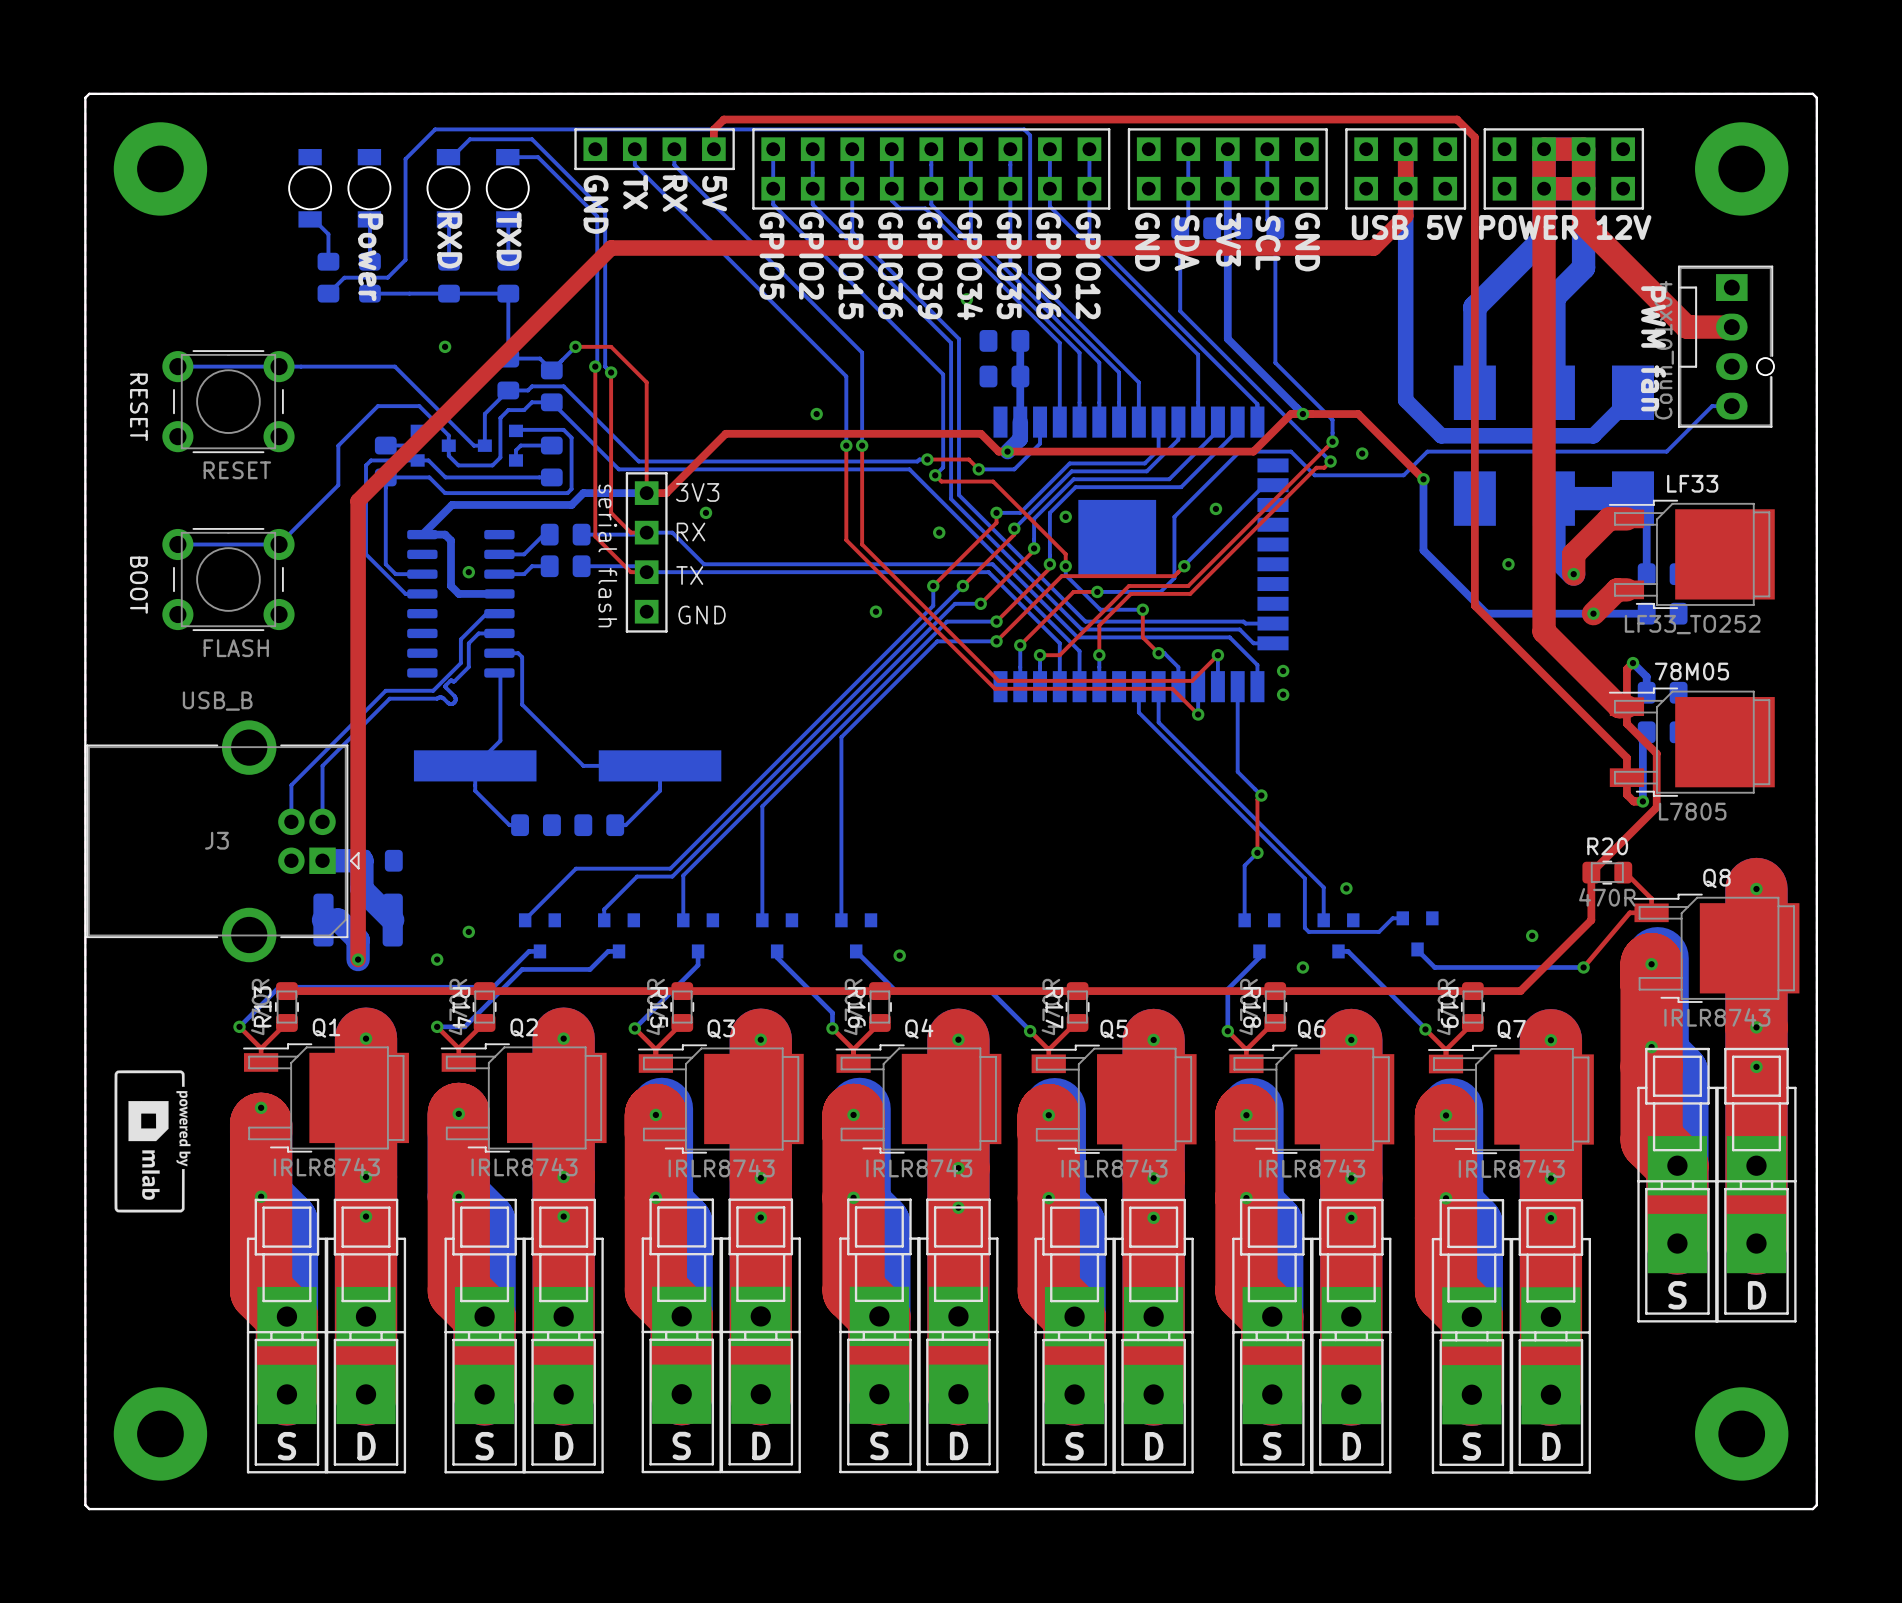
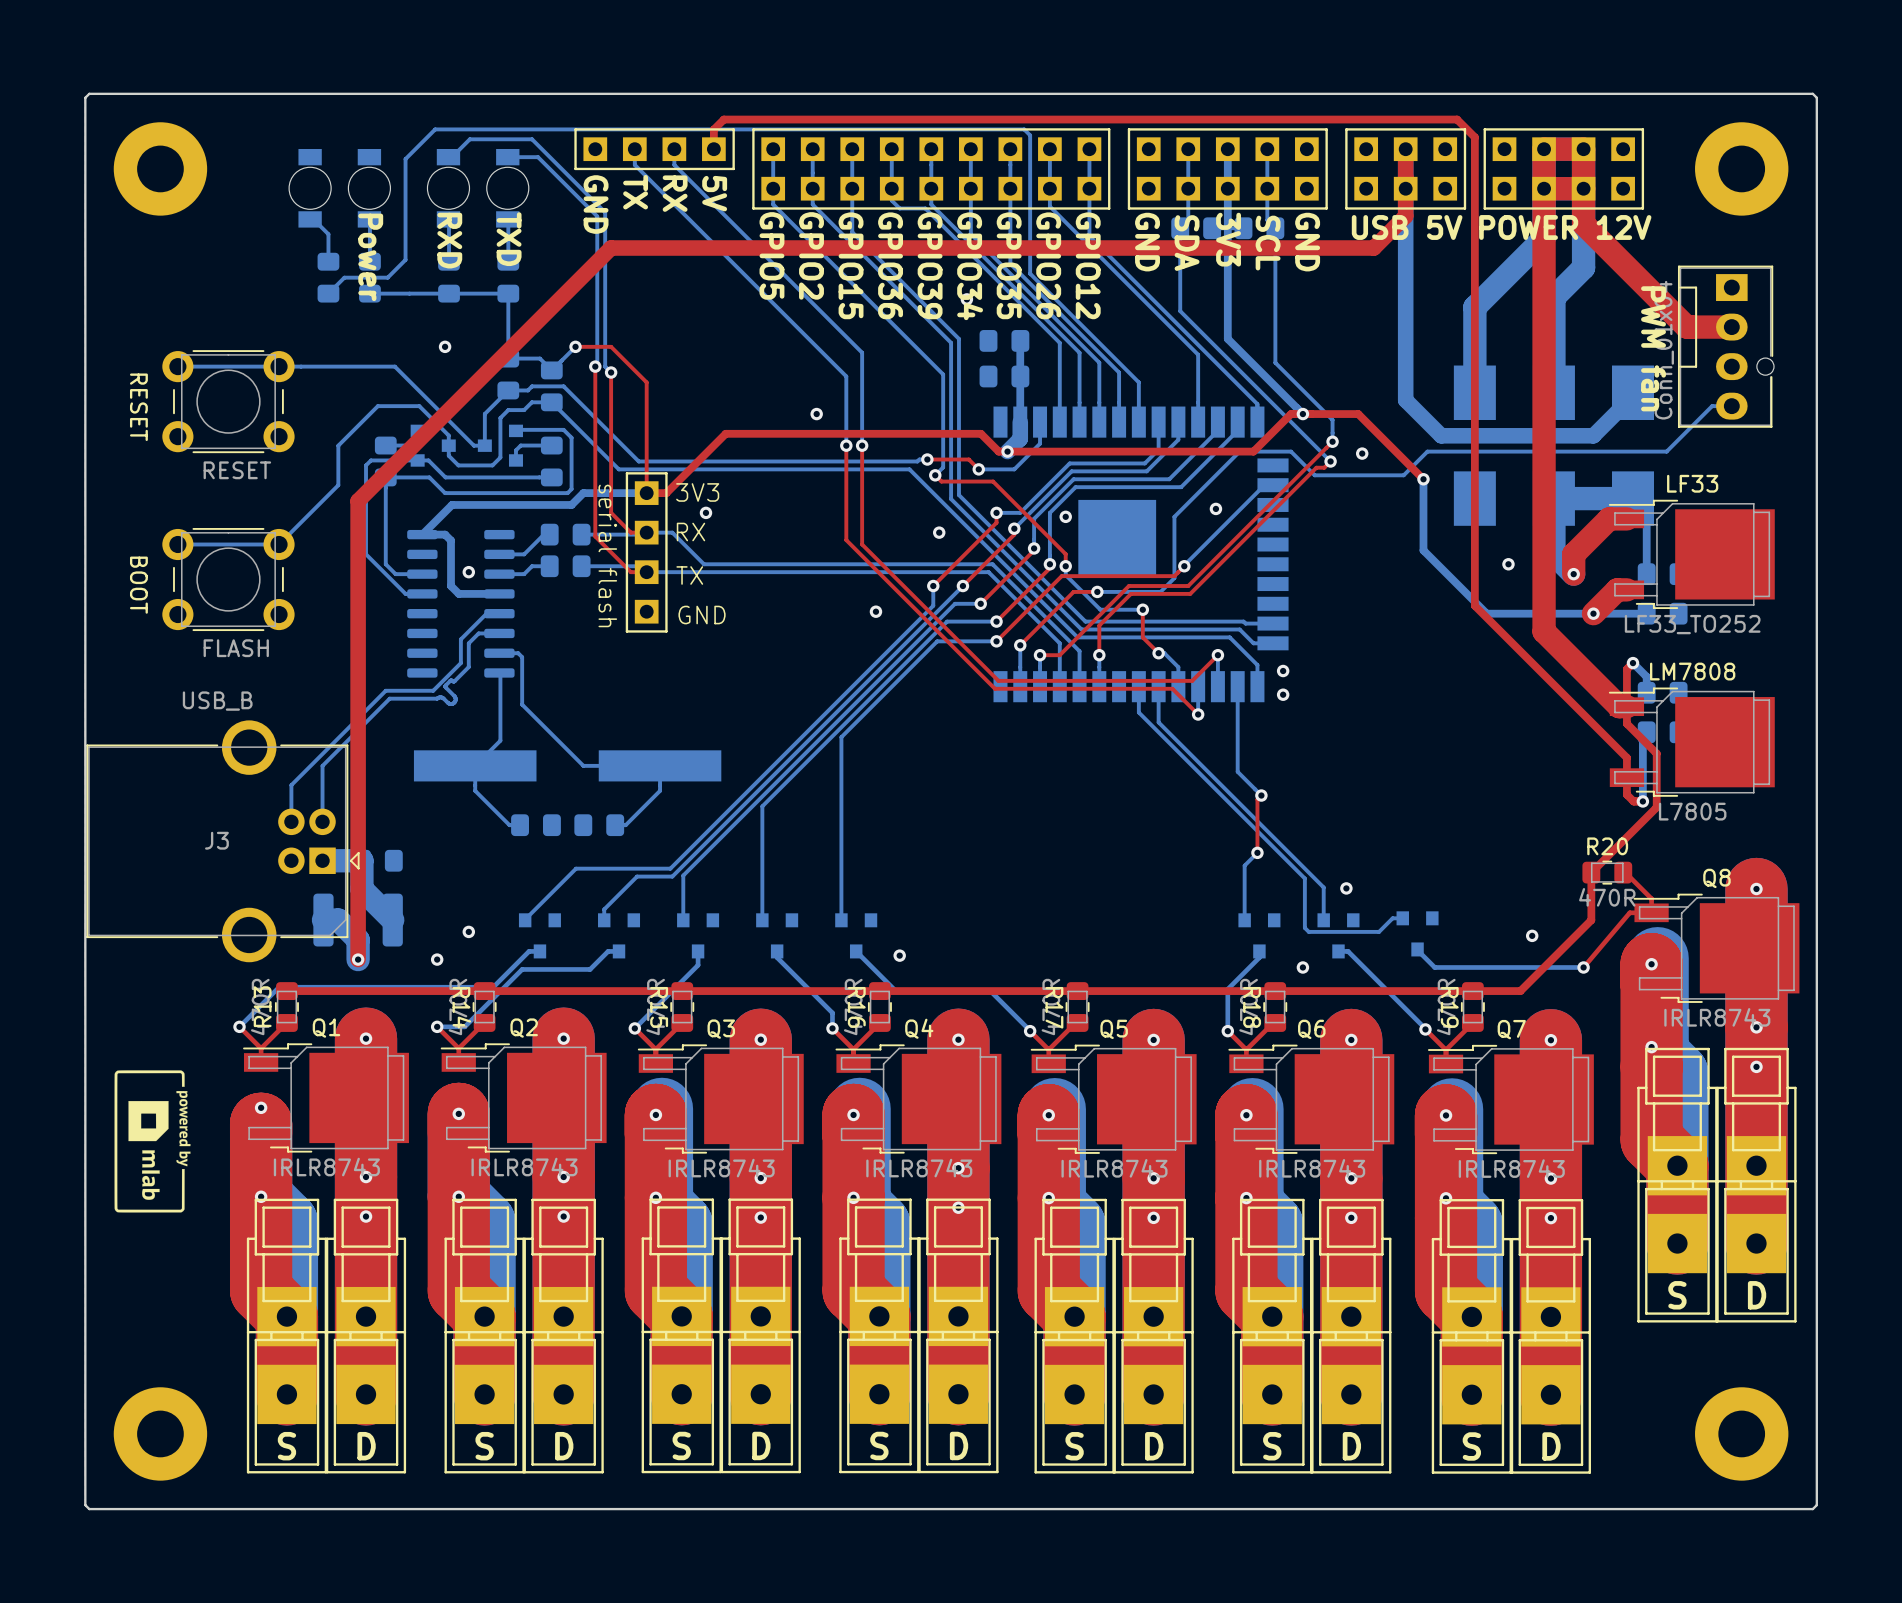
78M05 name: 78M05 (1691, 671) -> LM7808 (1692, 671)

